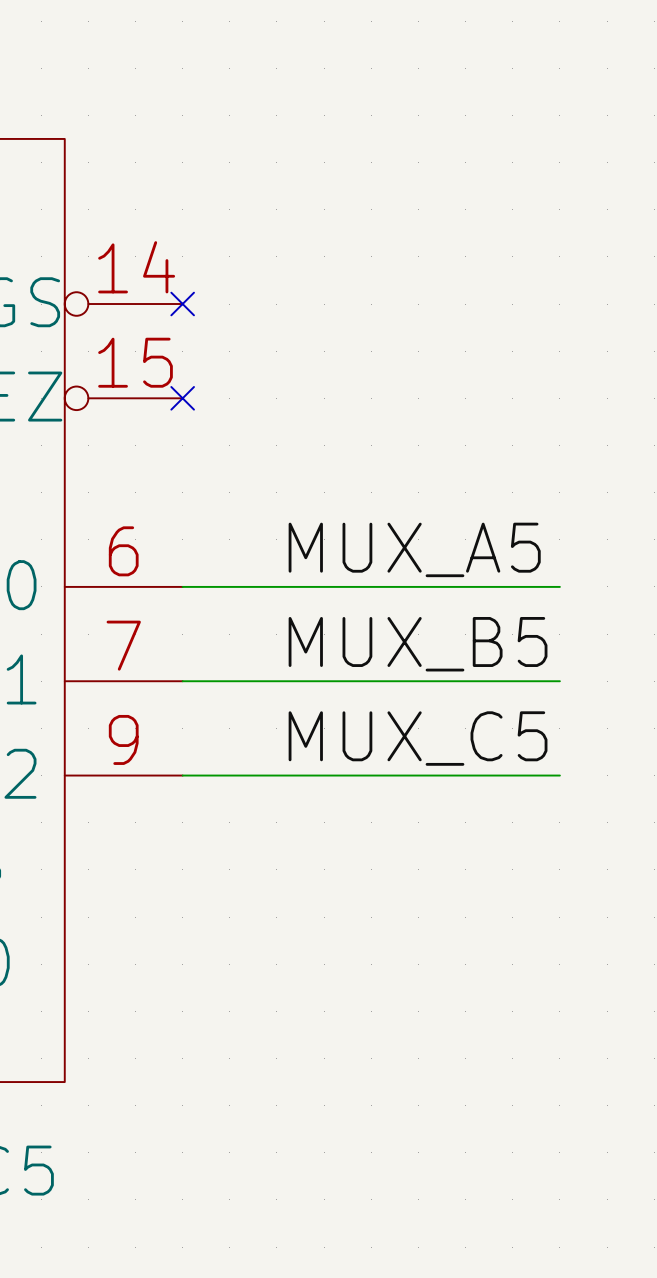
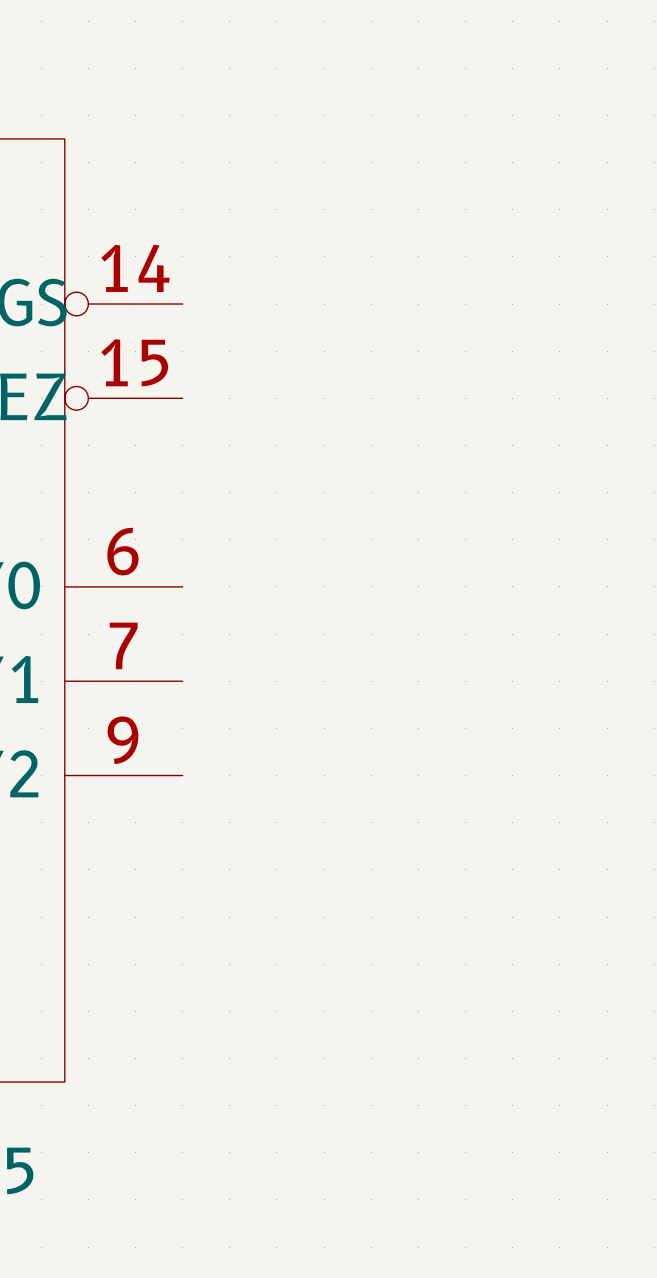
no-connect mark: (182, 304) -> none
no-connect mark: (182, 398) -> none
label: MUX_A5 (414, 549) -> none
wire: (182, 586) (559, 586) -> none
label: MUX_B5 (418, 644) -> none
wire: (182, 681) (559, 681) -> none
label: MUX_C5 (418, 738) -> none
wire: (182, 775) (559, 775) -> none

